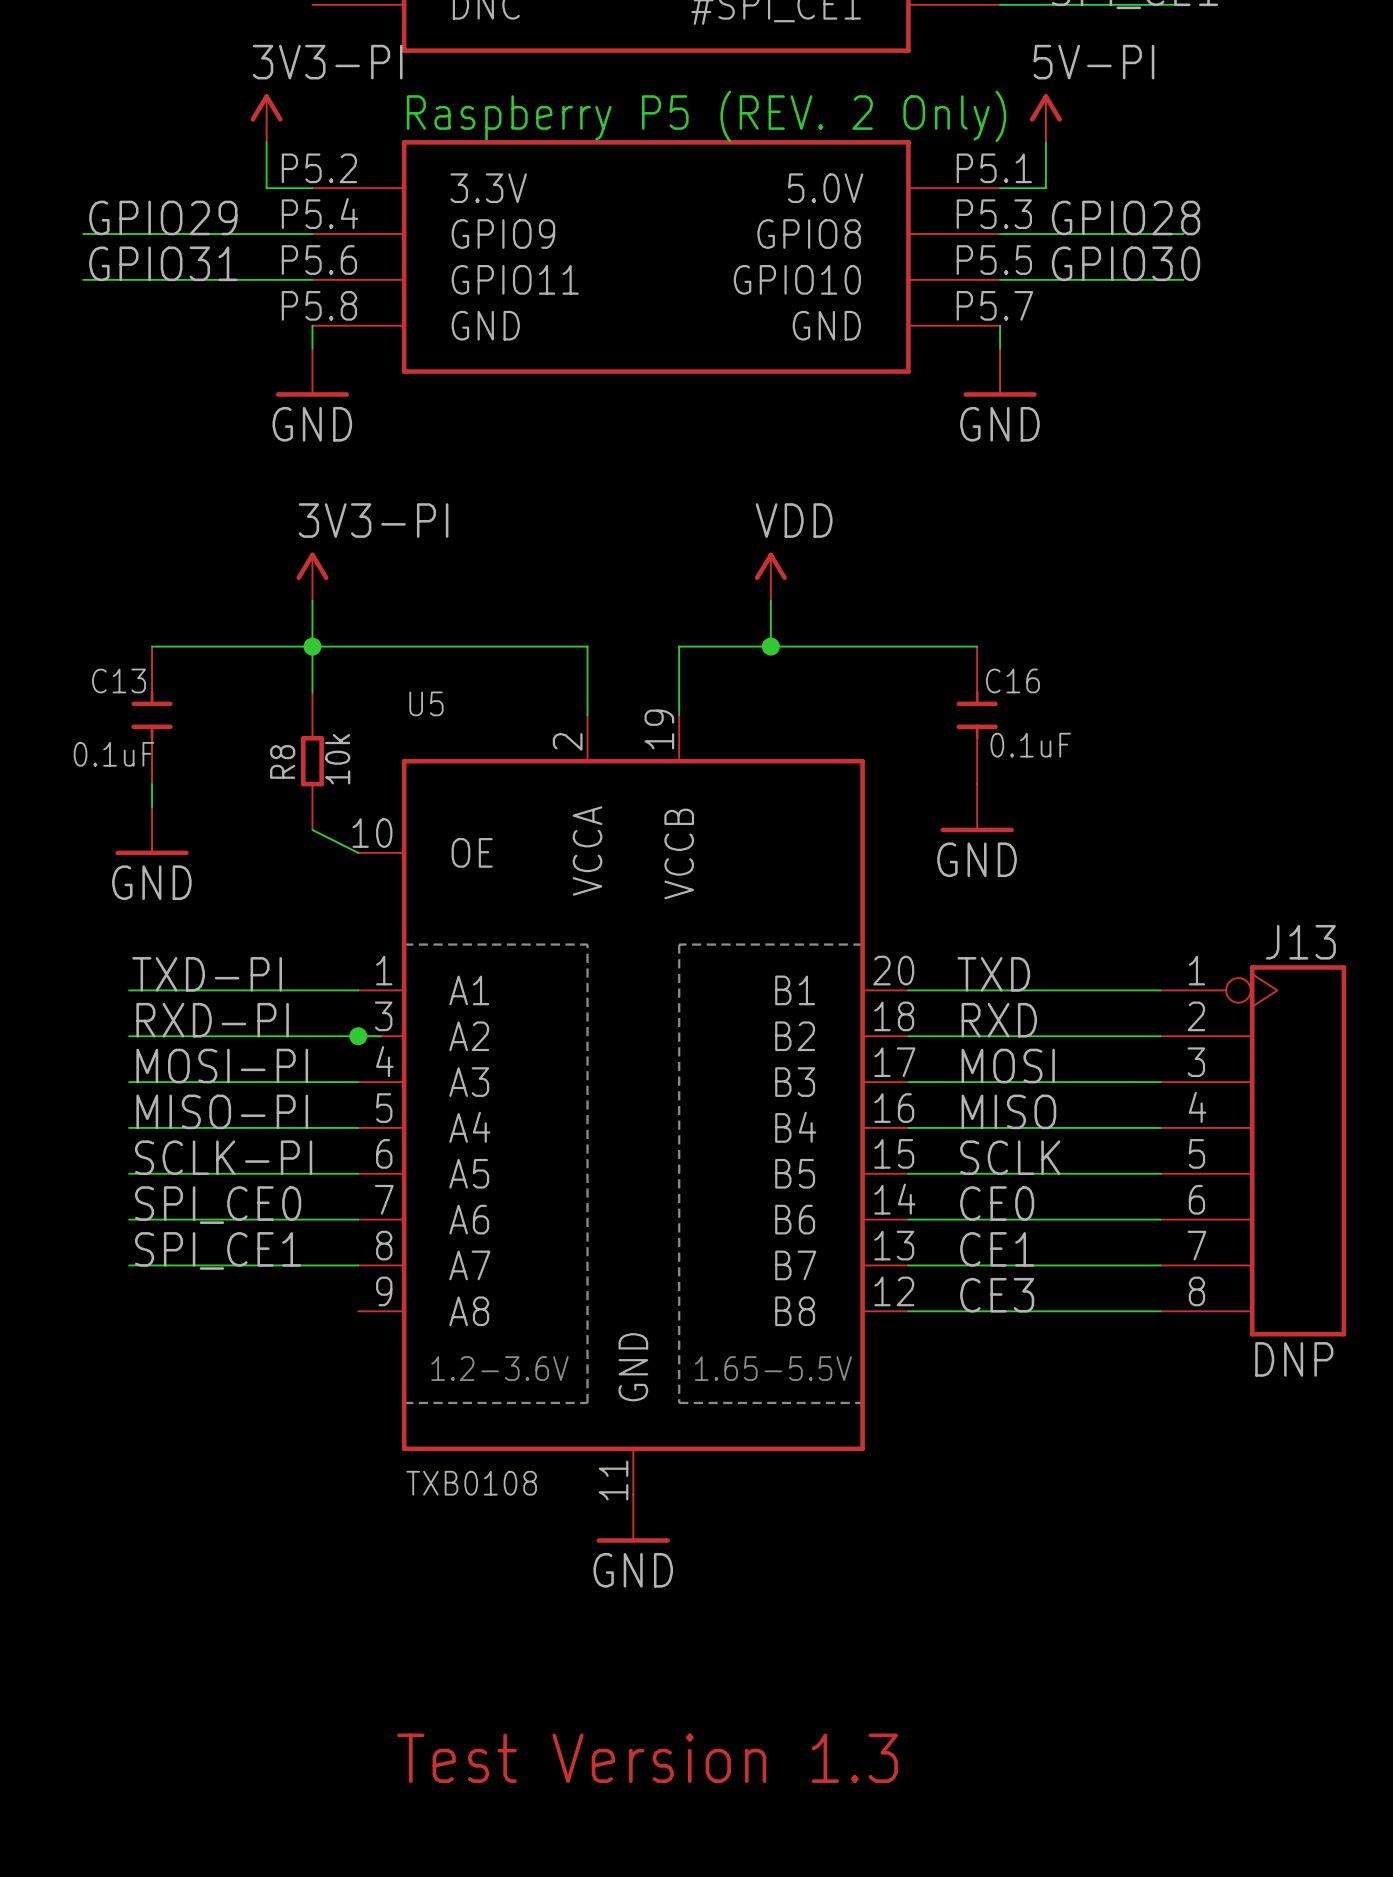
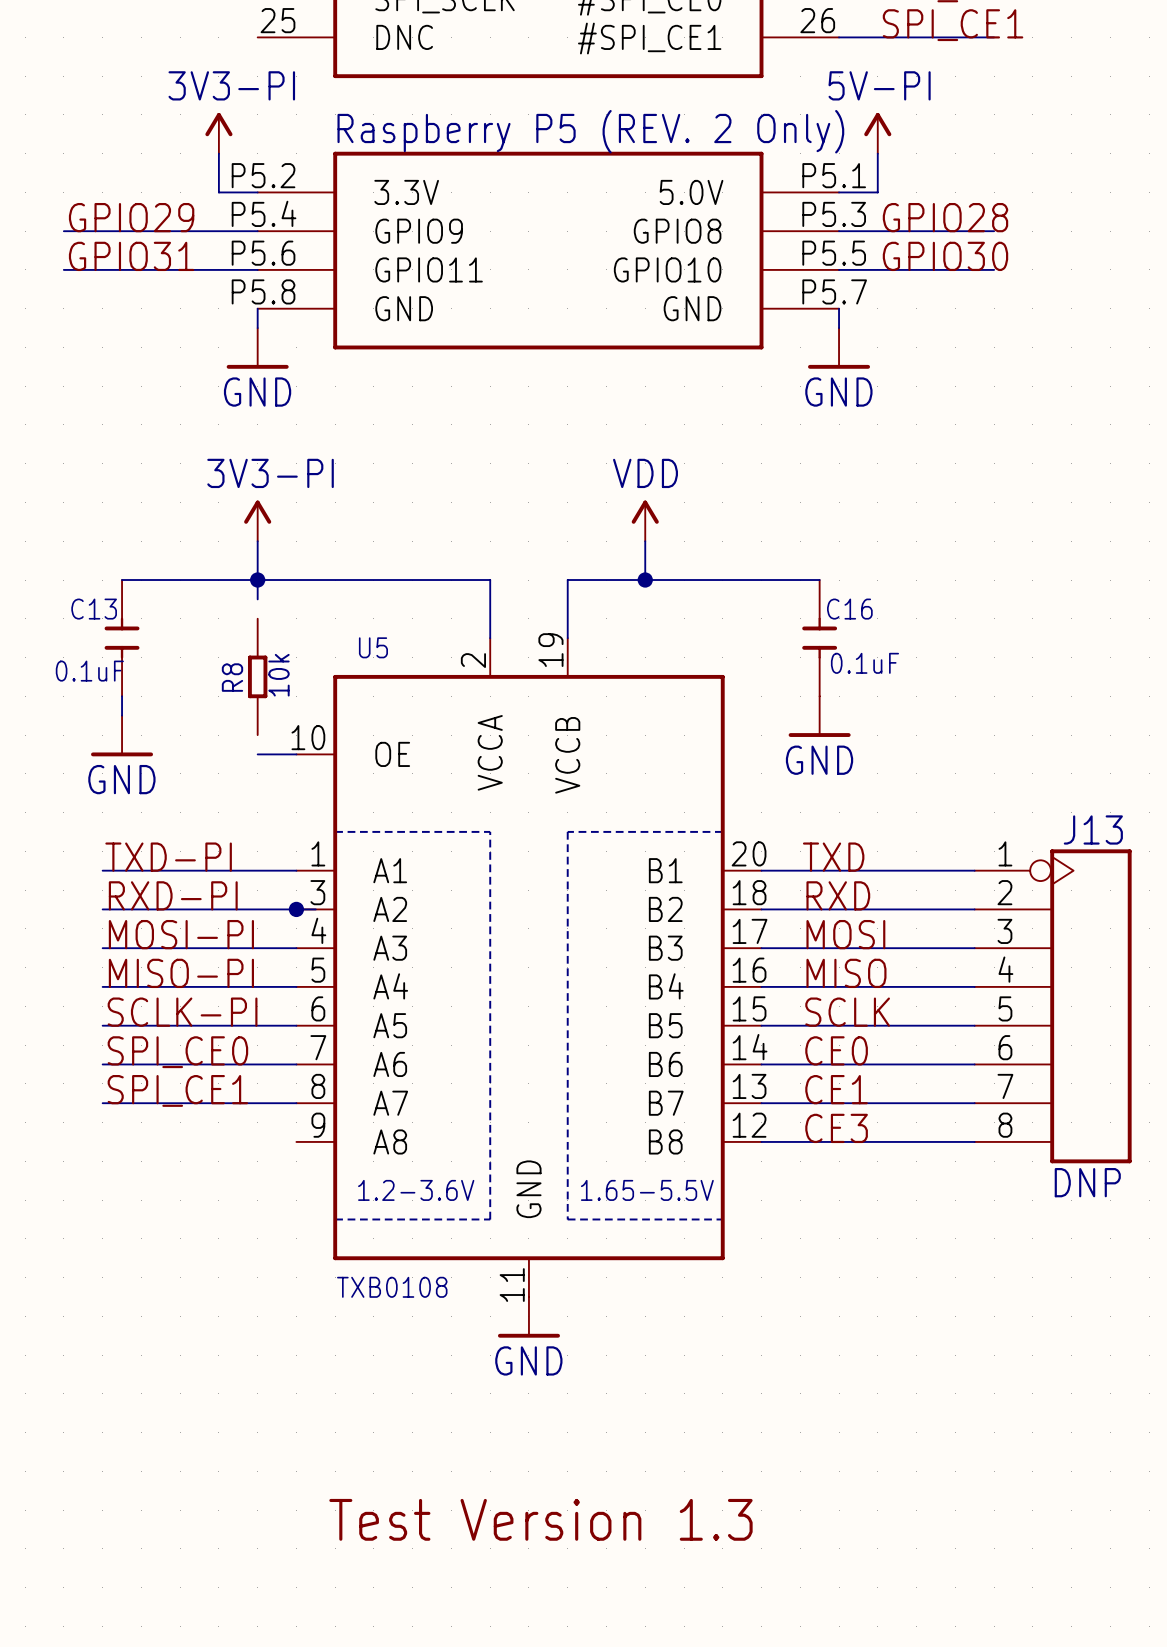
power symbol text position: 3V3-PI (327, 62) -> 3V3-PI (231, 85)
power symbol text position: 5V-PI (1093, 62) -> 5V-PI (879, 85)
power symbol text position: 3V3-PI (373, 520) -> 3V3-PI (270, 473)
power symbol text position: VDD (794, 520) -> VDD (645, 473)
wire: (312, 669) (312, 692) -> none
U5 name position: U5 (426, 703) -> U5 (373, 647)
wire: (312, 829) (358, 852) -> (257, 754) (296, 754)

